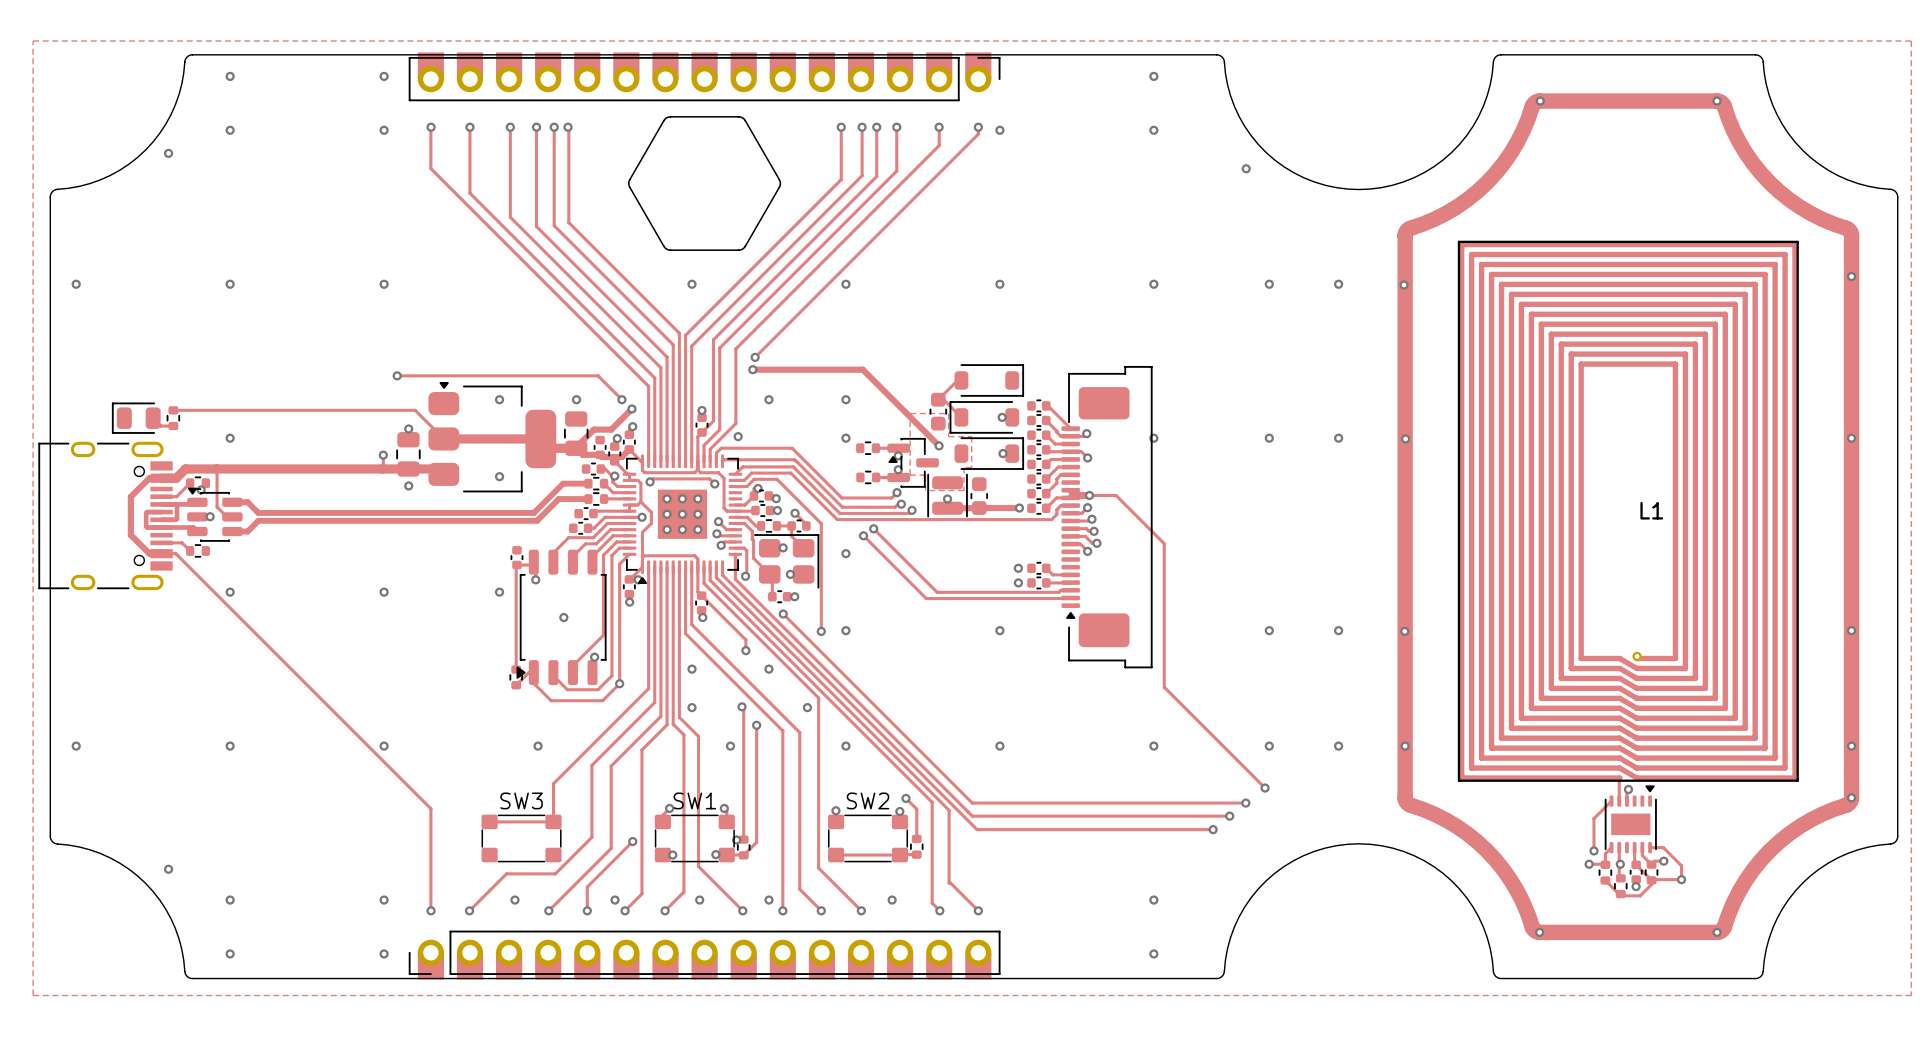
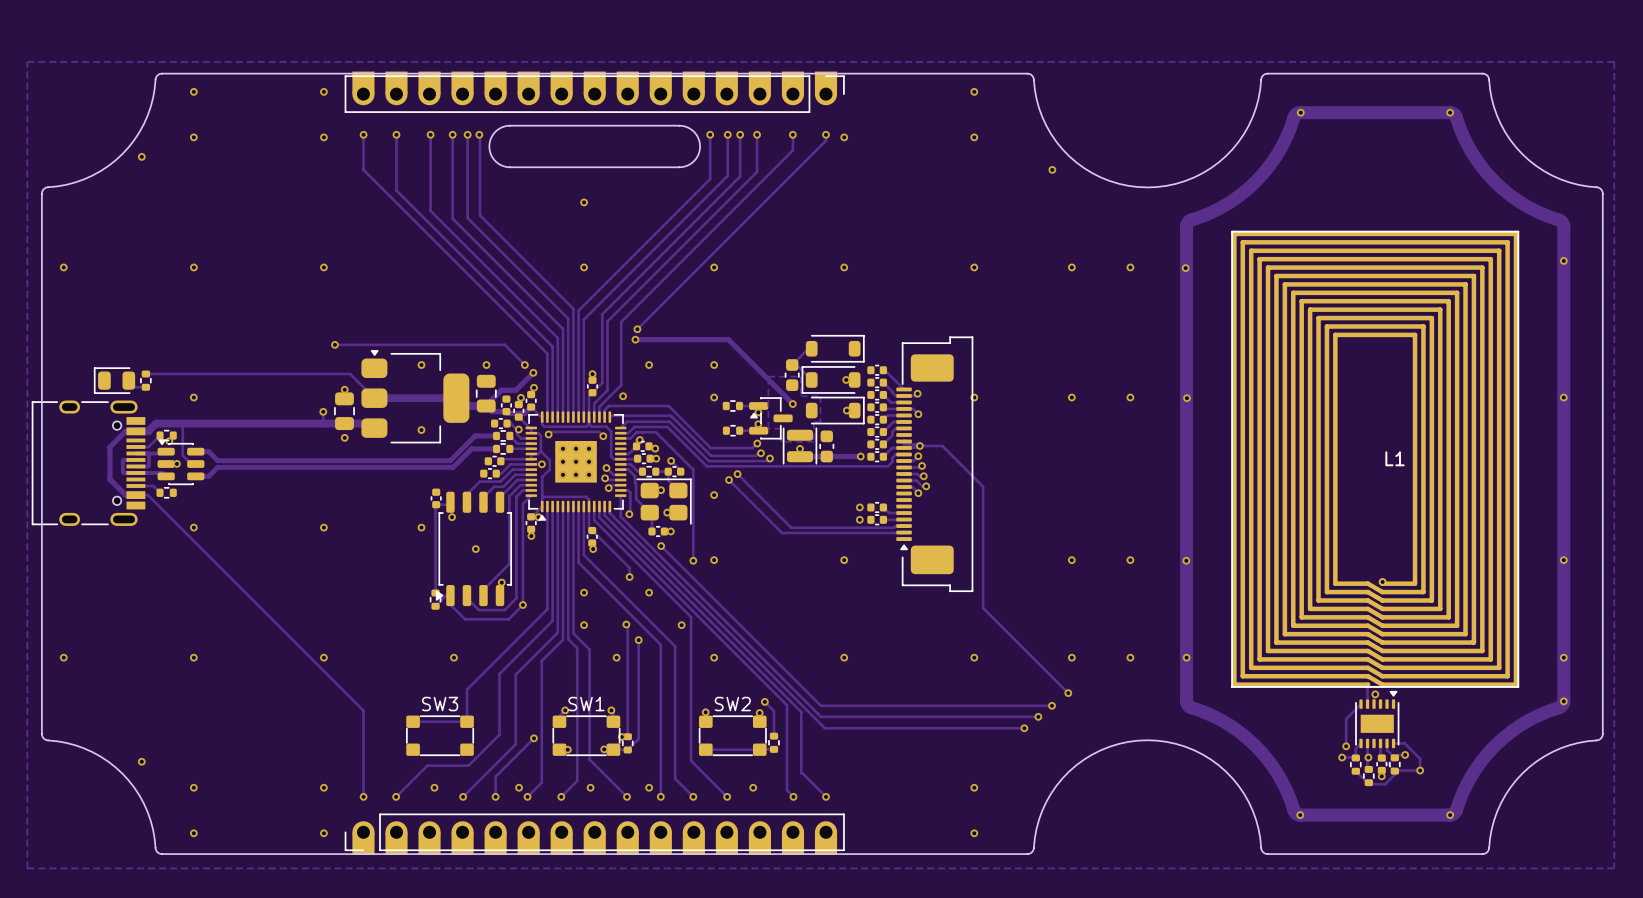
board edge: none -> (510, 125) (681, 125) (689, 128) (695, 133) (699, 141) (699, 149) (693, 161) (681, 167) (507, 167) (494, 160) (489, 146) (491, 136) (496, 130) (510, 125)
board edge: (670, 116) (742, 117) (779, 179) (779, 187) (742, 249) (666, 249) (629, 187) (629, 179) (663, 120) (670, 116) -> none
via: none -> (584, 202)

